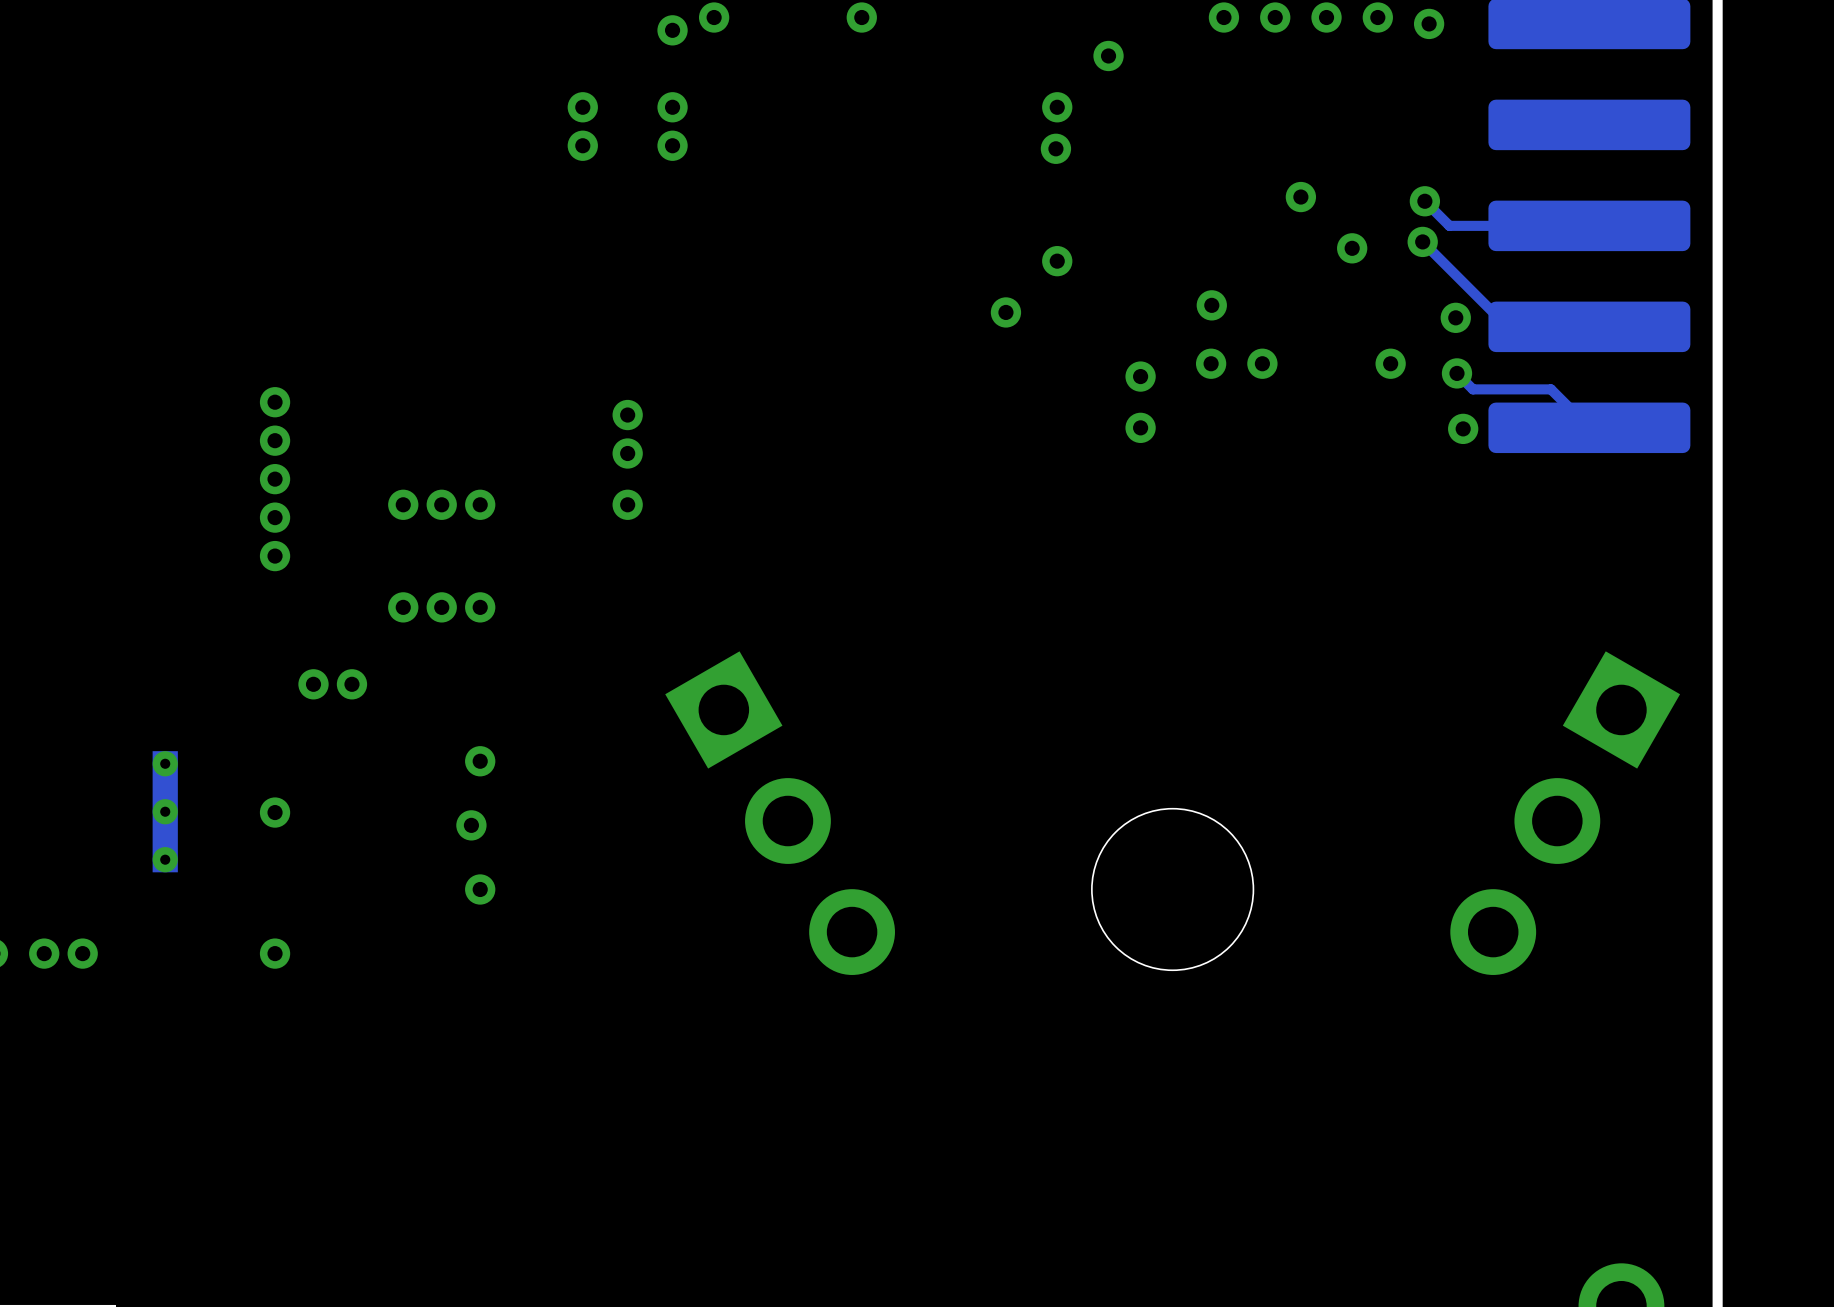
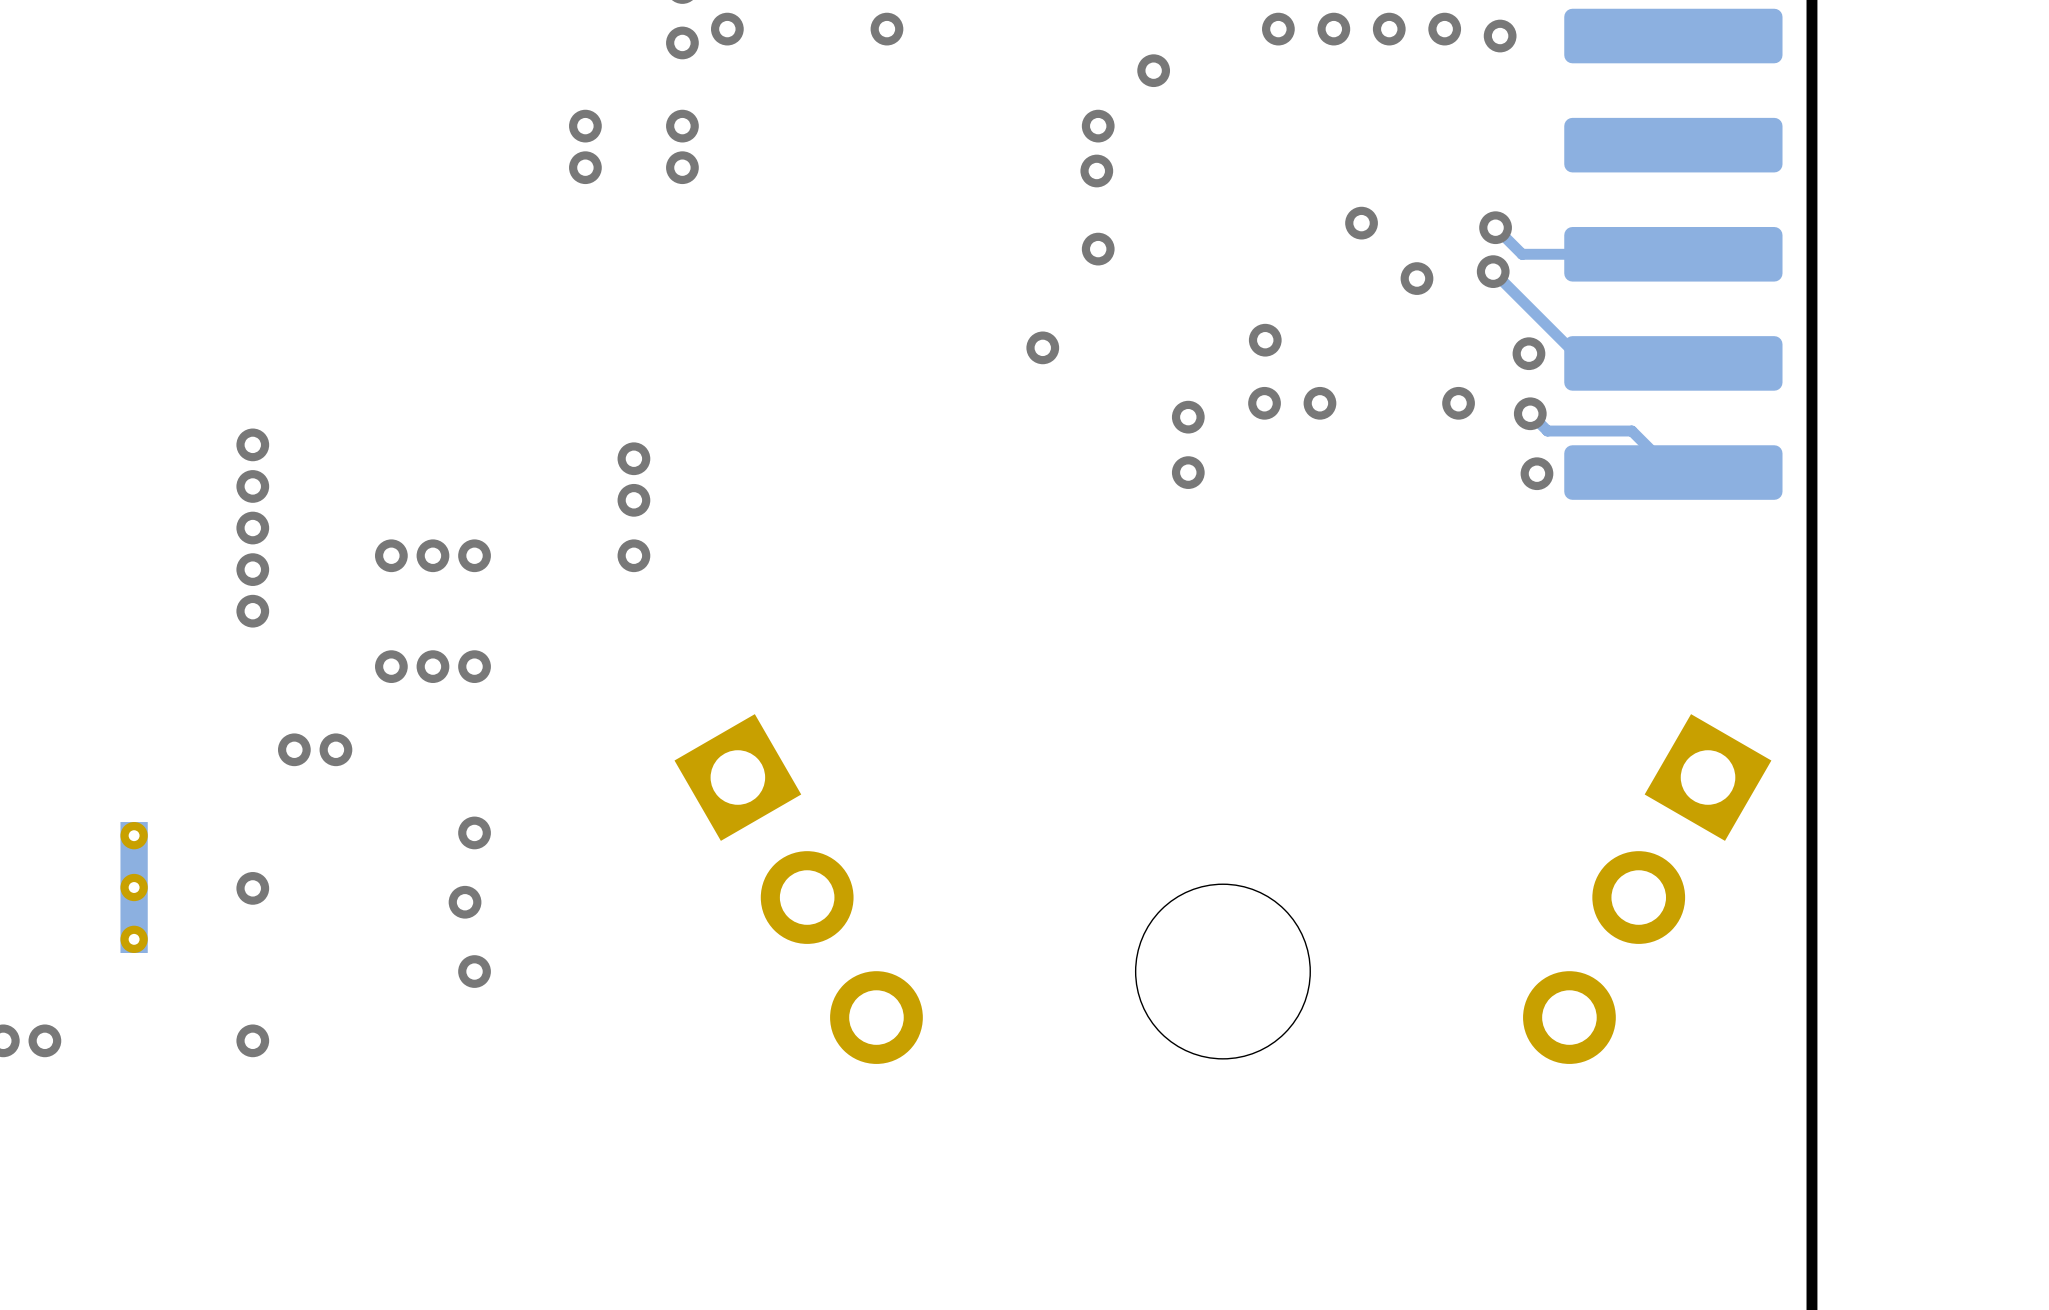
via position: (1057, 261) -> (1098, 249)

